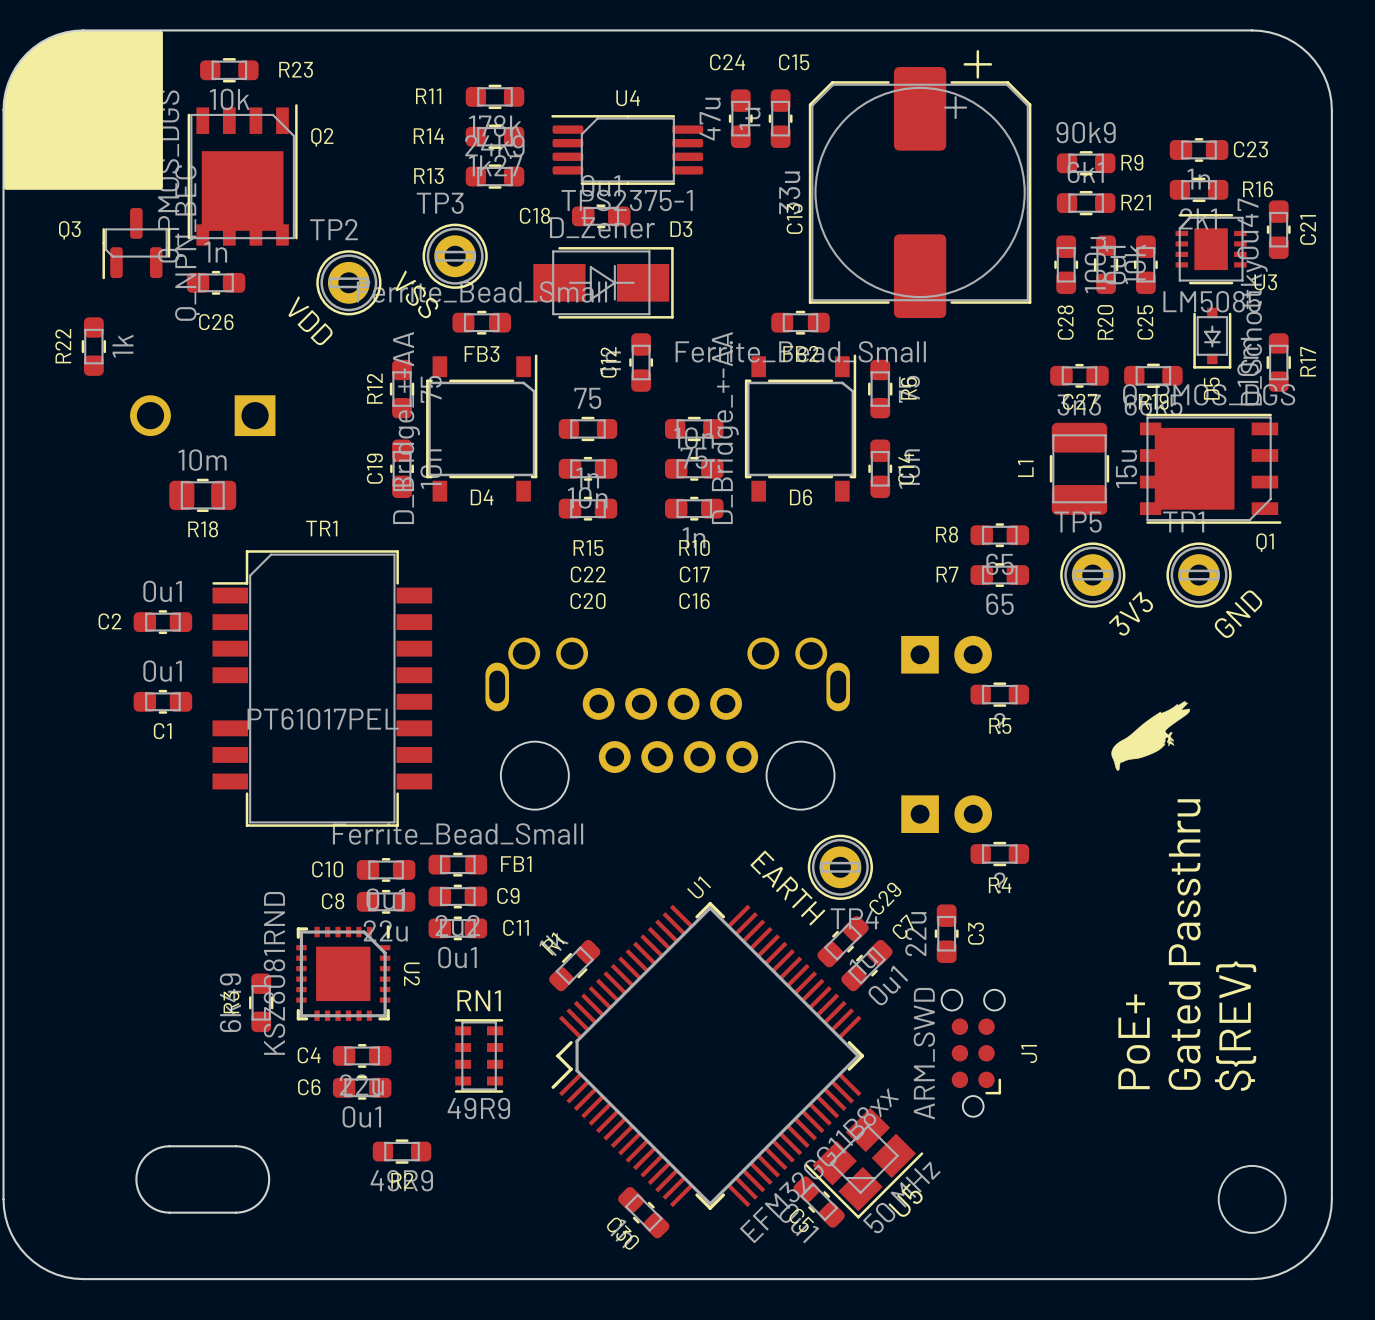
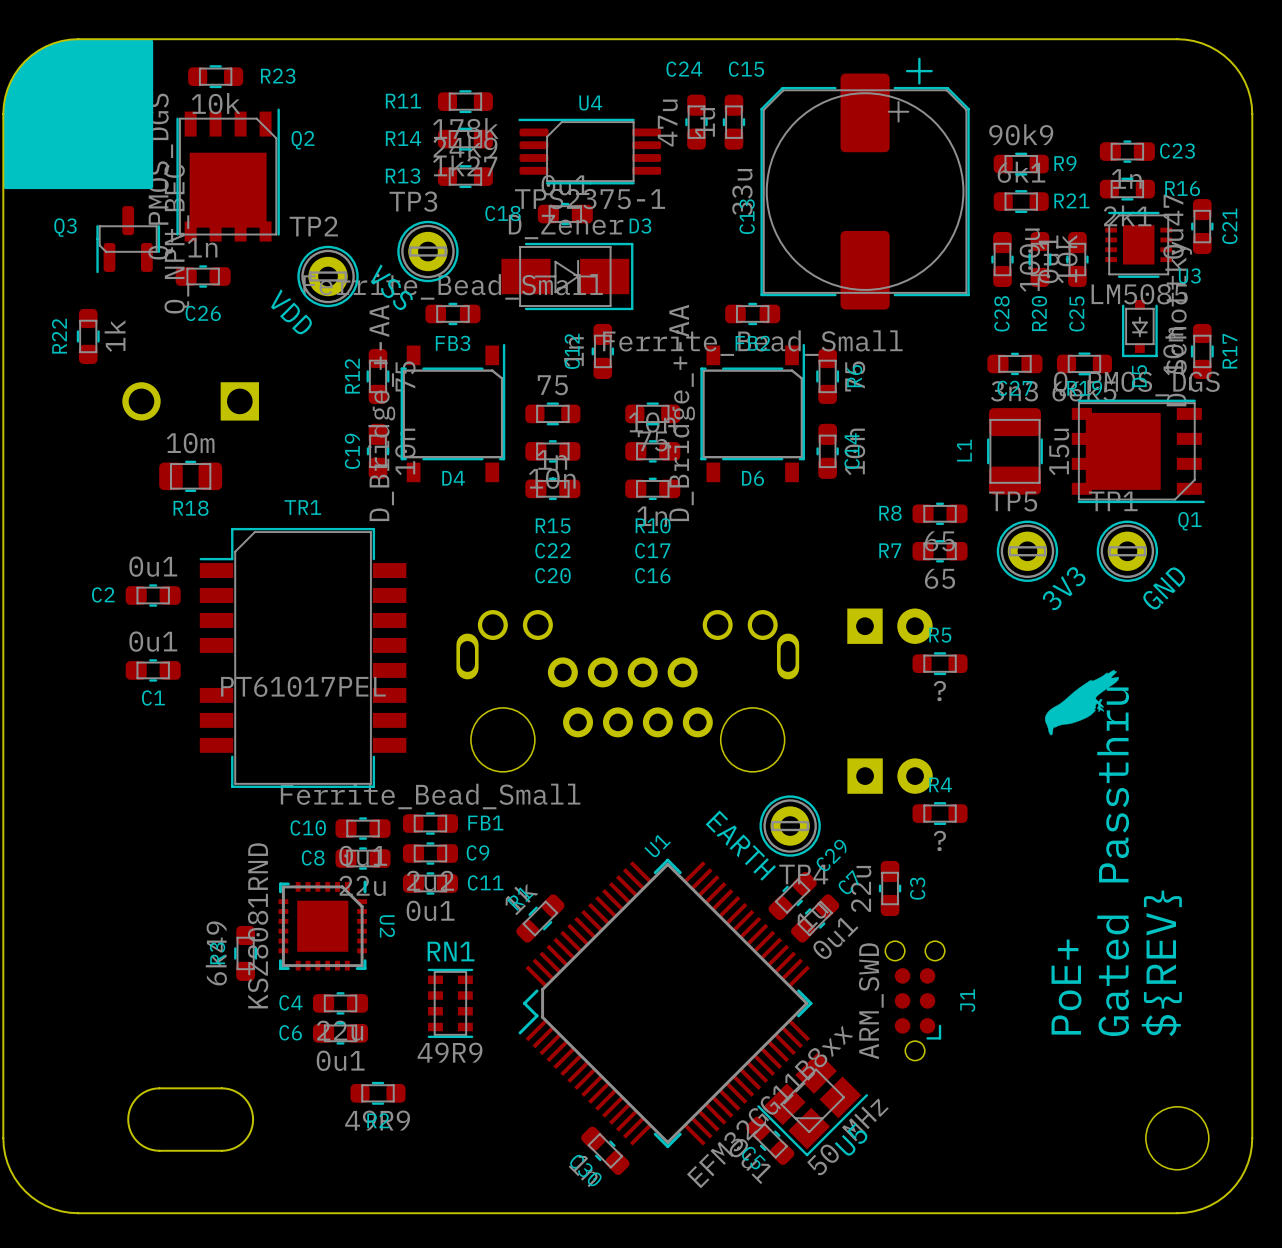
R5 name position: R5 (1000, 725) -> R5 (940, 635)
R4 name position: R4 (1000, 885) -> R4 (940, 784)

